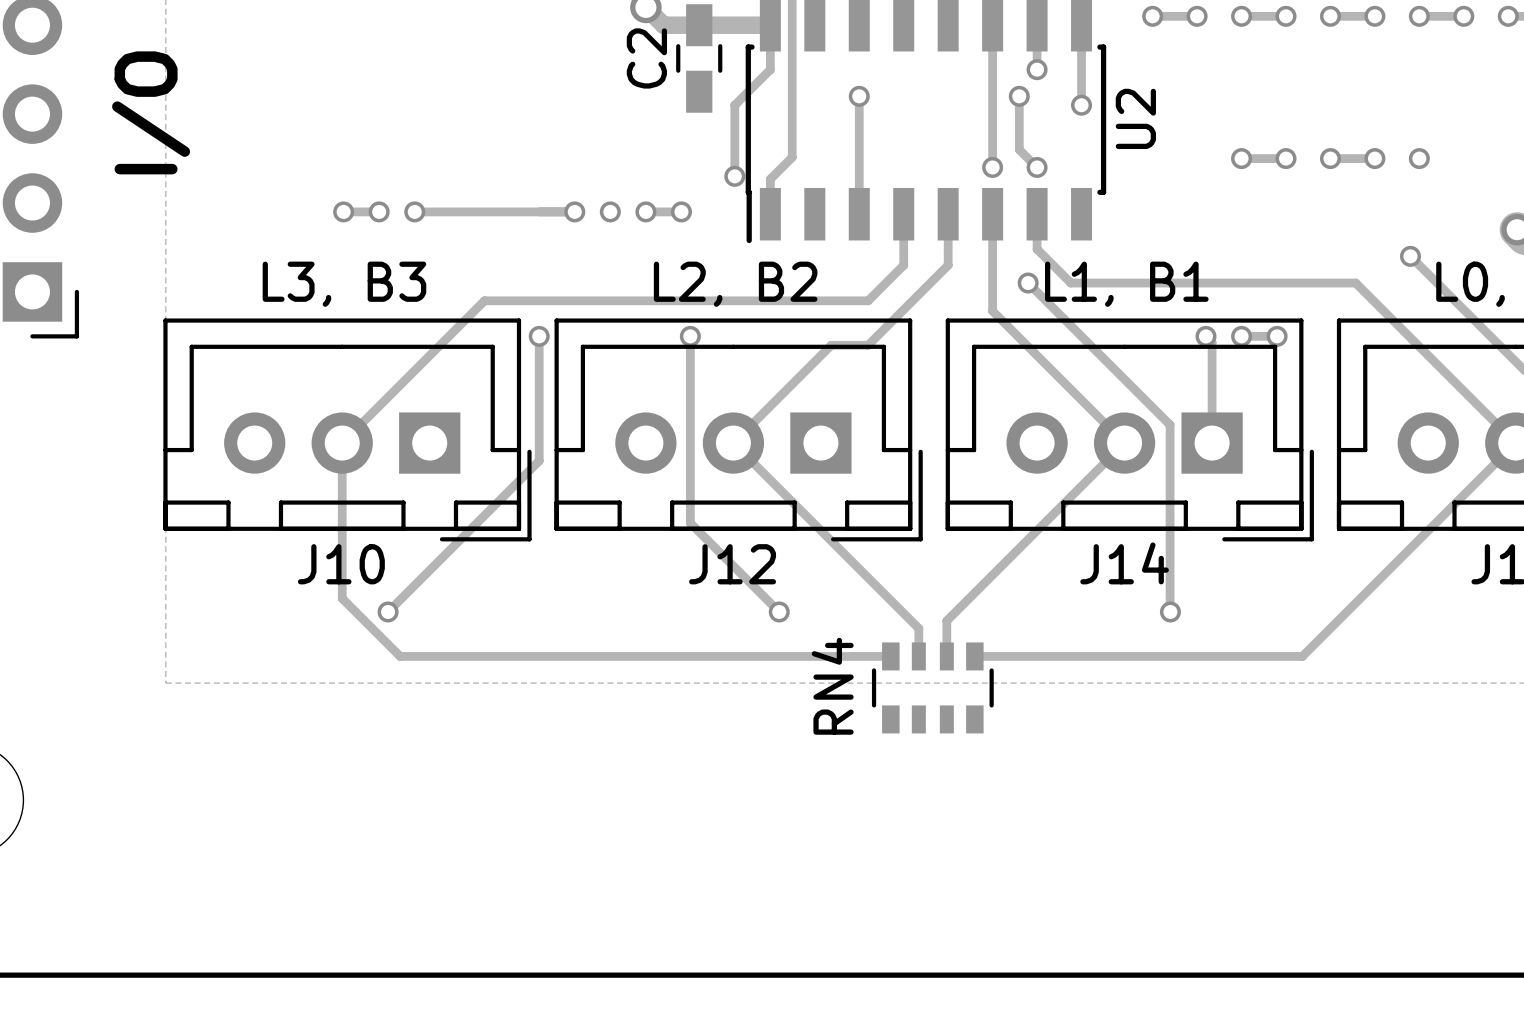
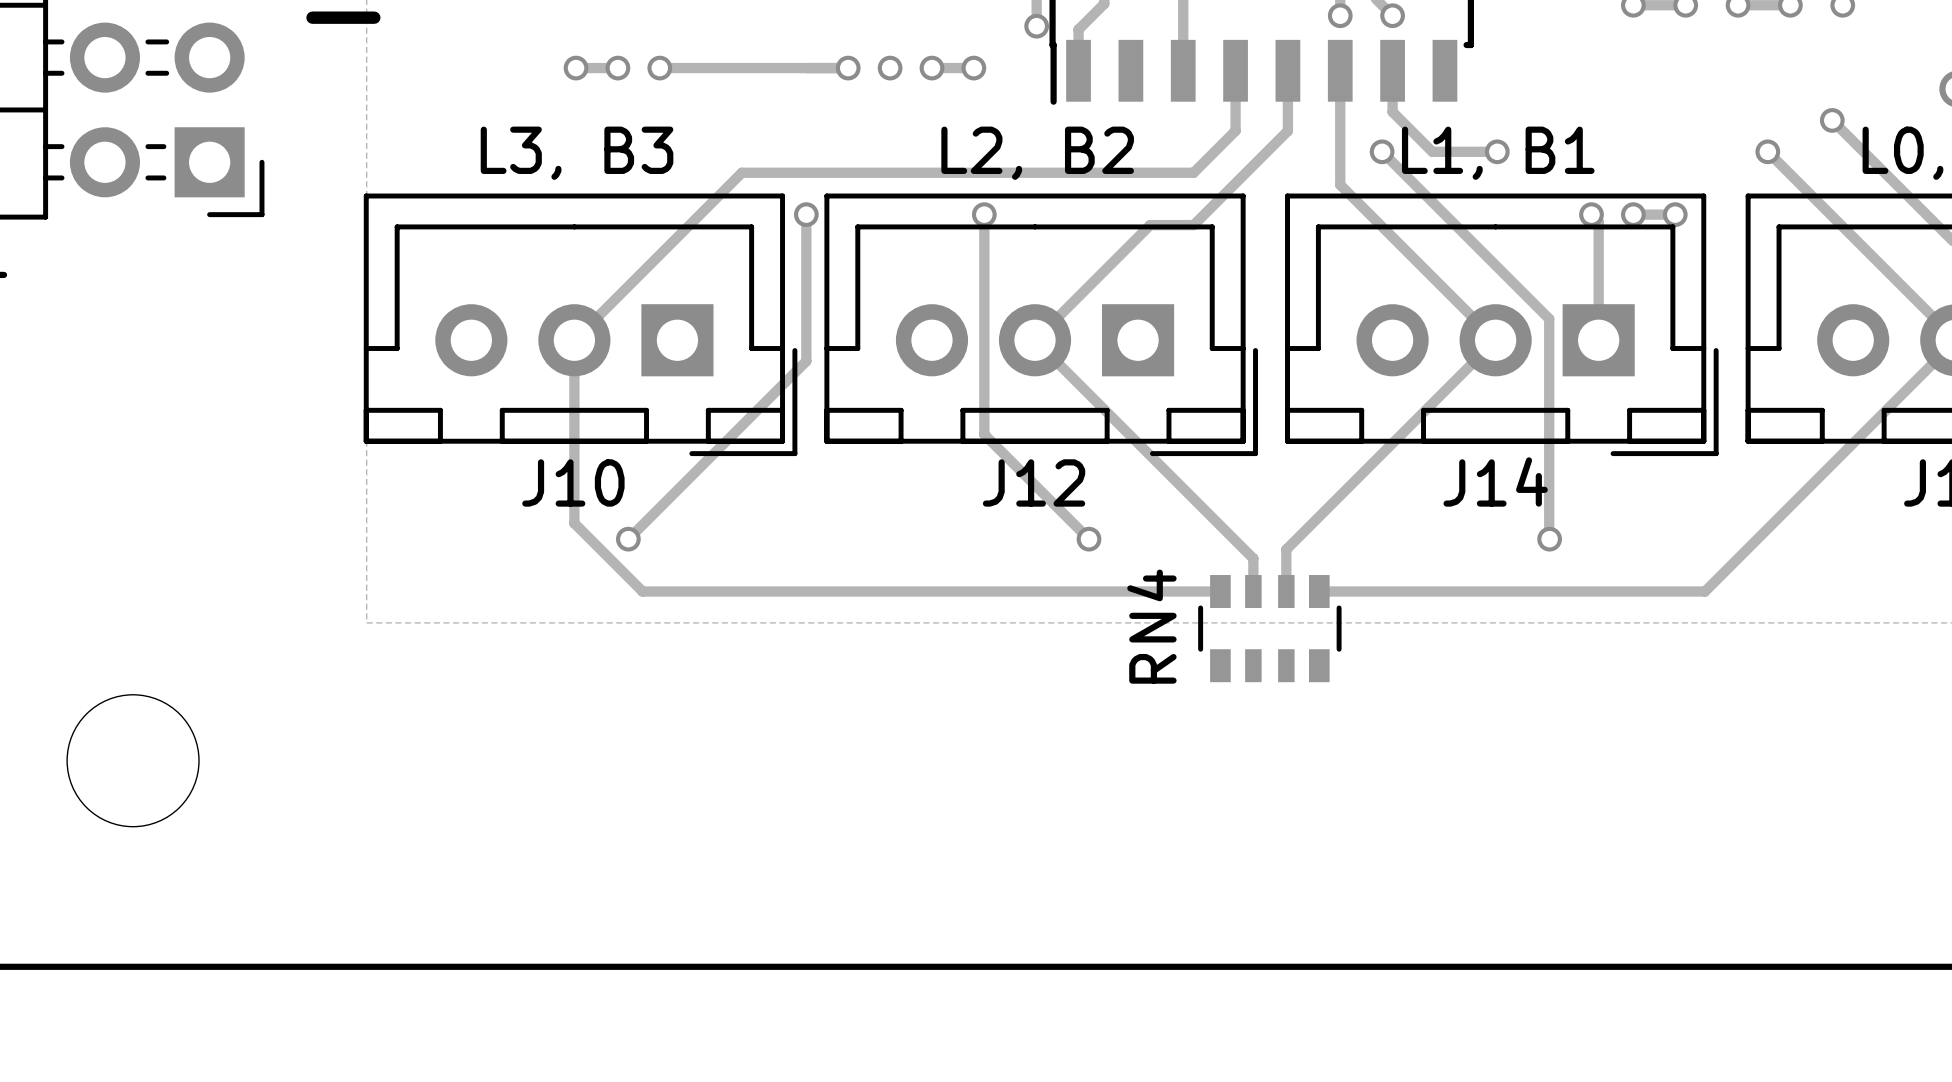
track: (1125, 283) (1355, 283) -> none
via: none -> (1497, 151)
via: none -> (1767, 151)

